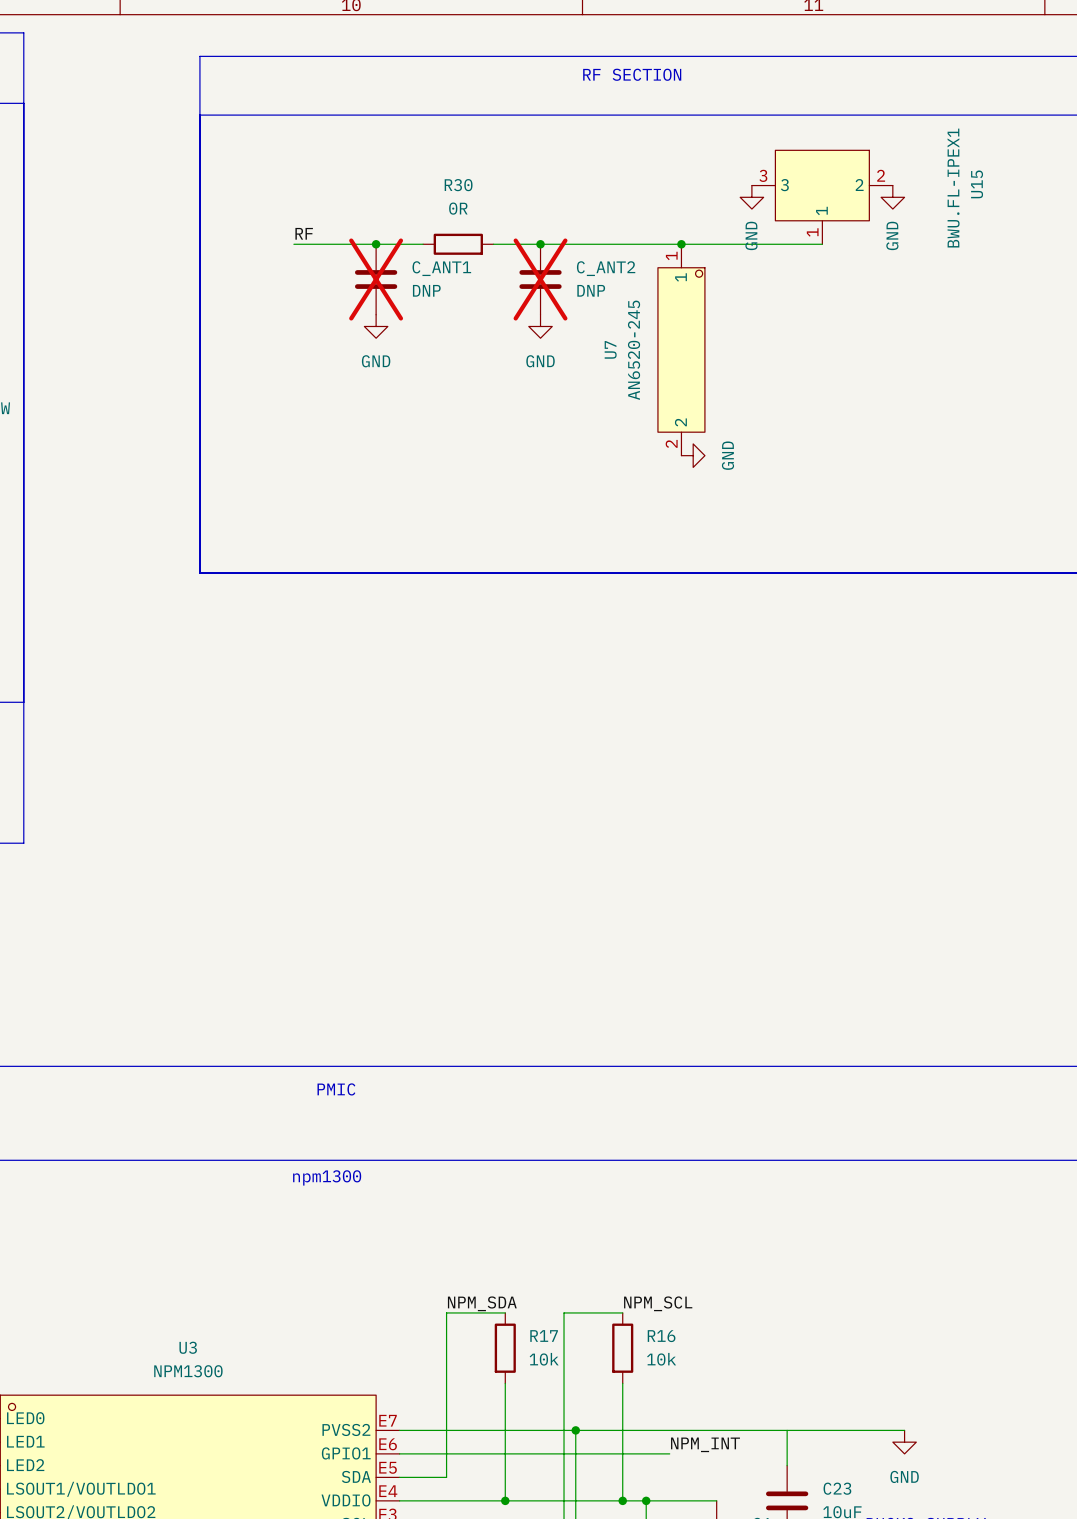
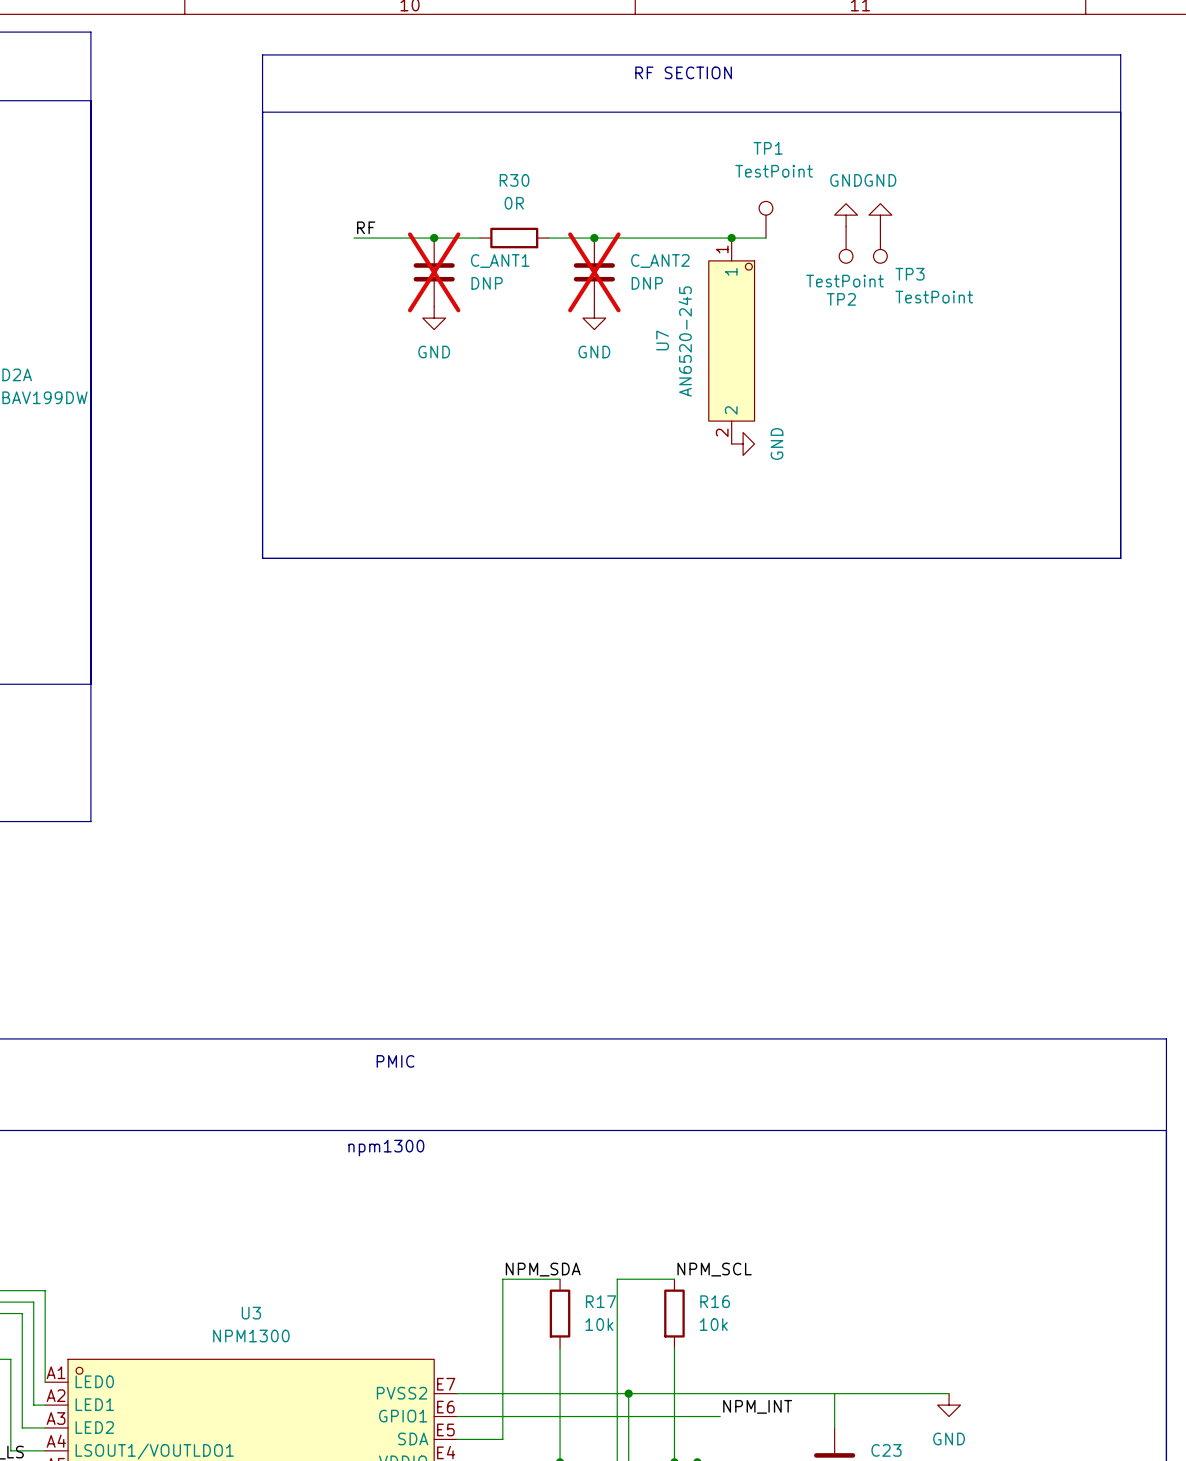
power symbol: GND (751, 197) -> none
U15: BWU.FL-IPEX1 (822, 197) -> none
power symbol: GND (892, 197) -> none
power symbol: none -> GND (846, 215)
power symbol: none -> GND (880, 215)
TP1: none -> TestPoint (765, 219)
wire: (716, 244) (822, 244) -> none
TP2: none -> TestPoint (846, 244)
TP3: none -> TestPoint (880, 244)

